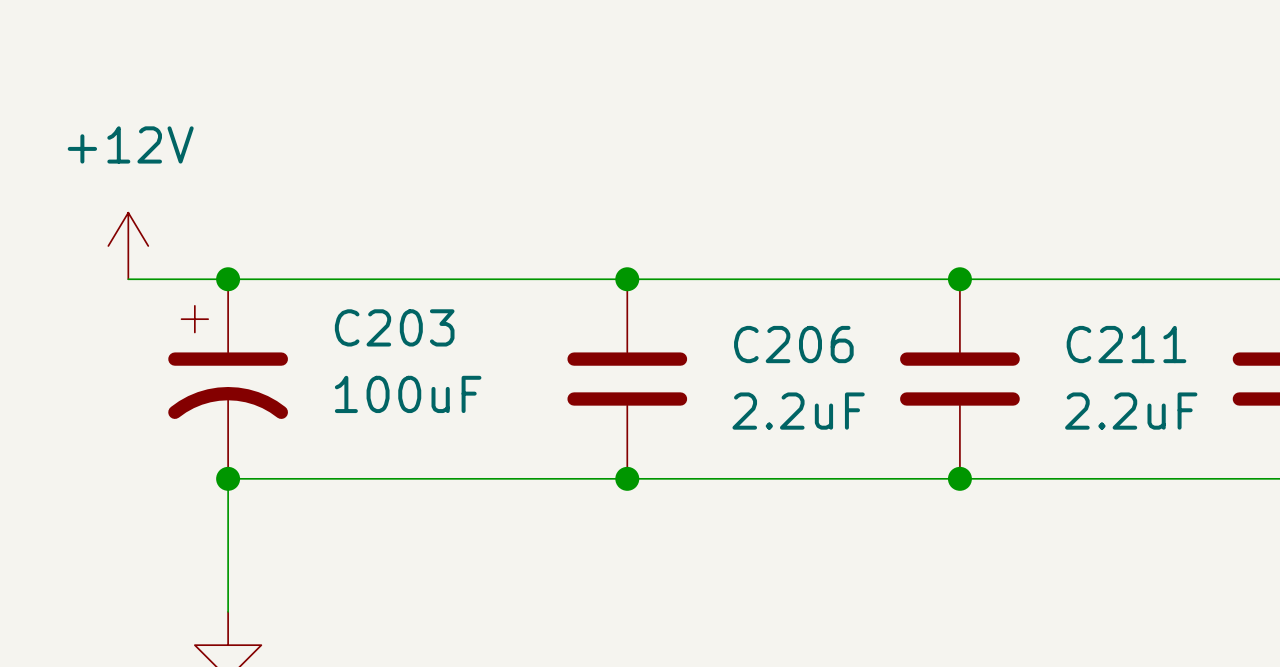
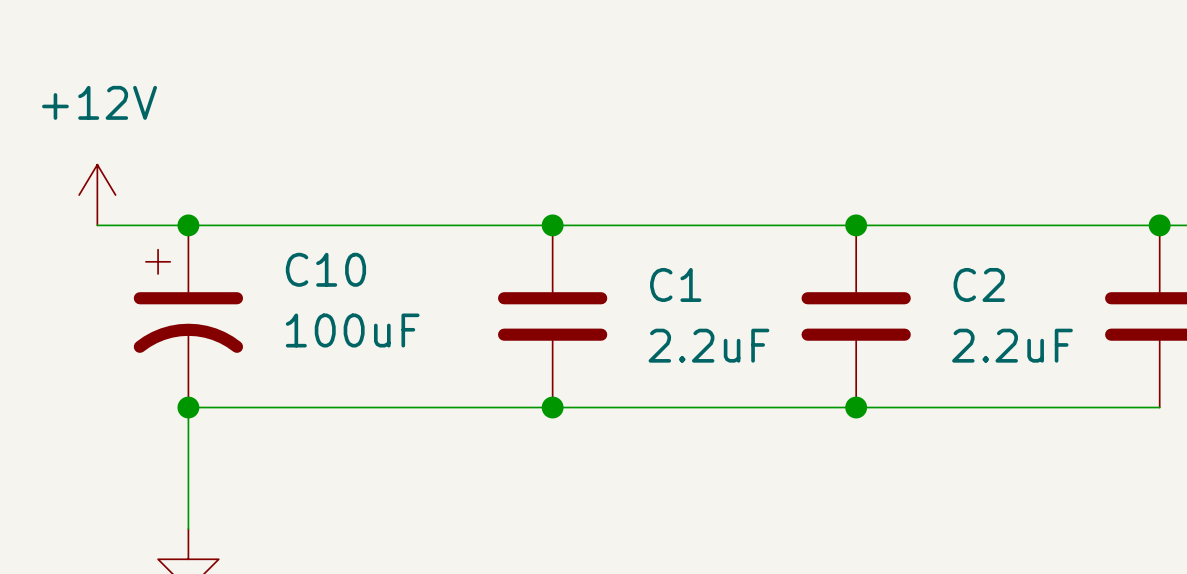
C203 name: C203 (394, 327) -> C10 (325, 269)
C206 name: C206 (793, 344) -> C1 (675, 284)
C211 name: C211 (1126, 344) -> C2 (979, 284)

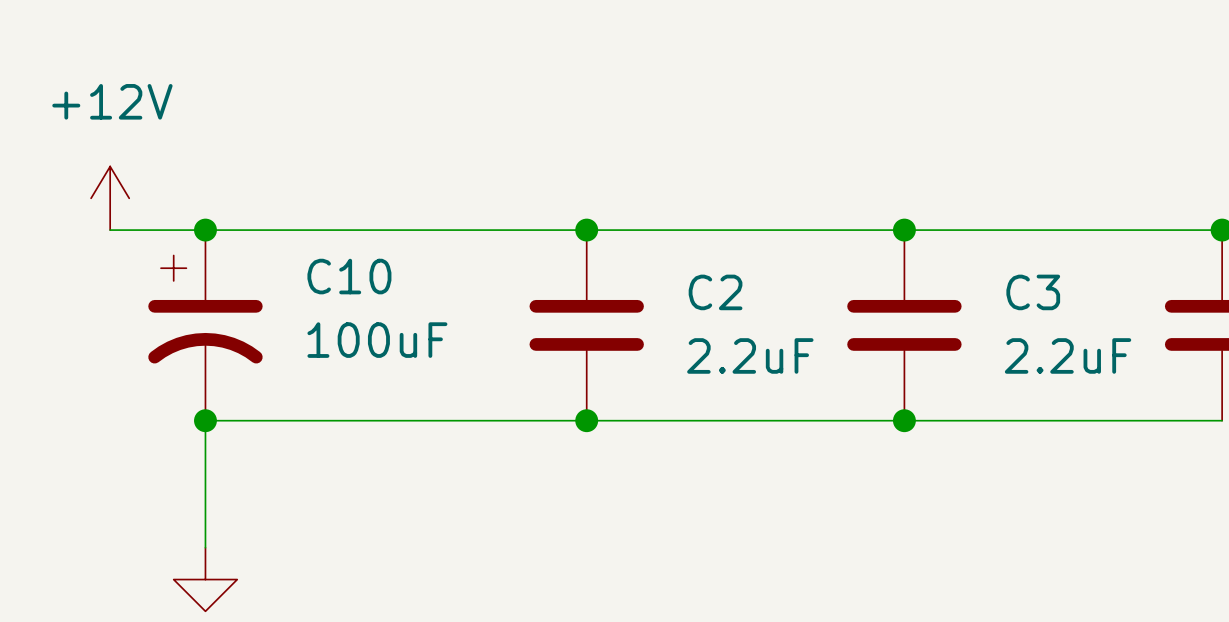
C1 name: C1 (675, 284) -> C2 (715, 292)
C2 name: C2 (979, 284) -> C3 (1033, 292)

